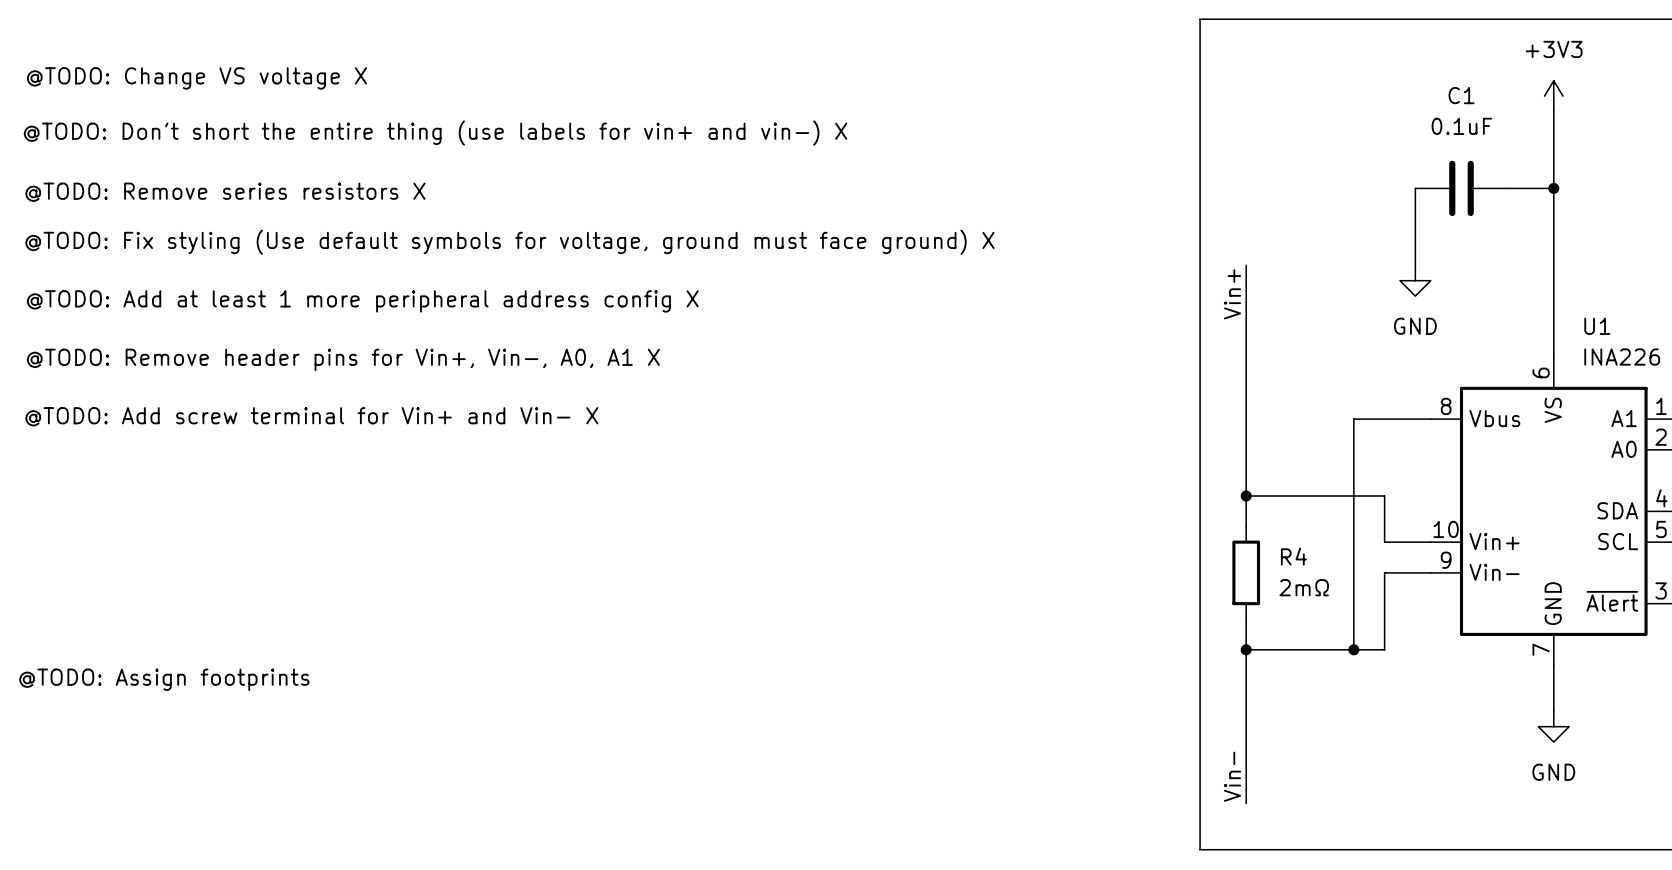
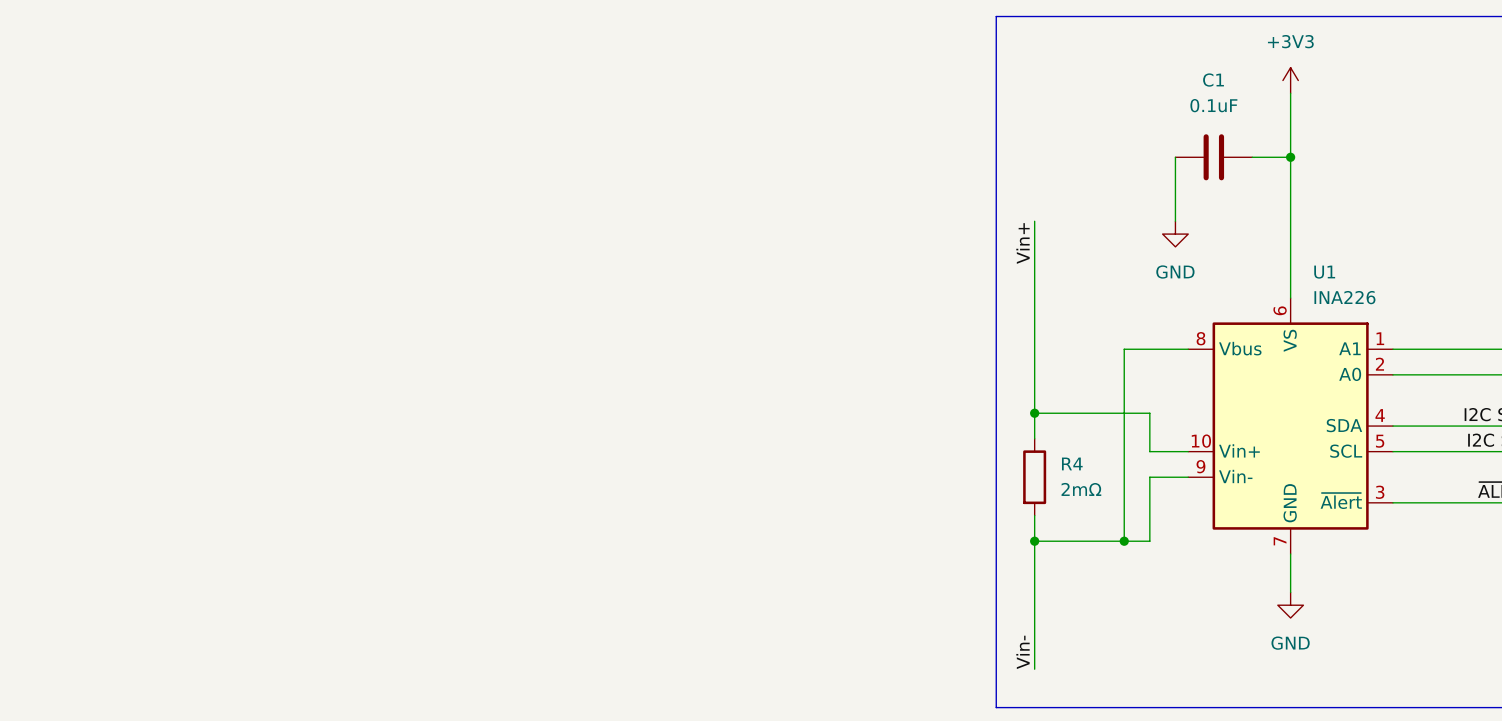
text: @TODO: Change VS voltage X (196, 78) -> none
text: @TODO: Don't short the entire thing (use labels for vin+ and vin-) X (435, 133) -> none
text: @TODO: Remove series resistors X (225, 192) -> none
text: @TODO: Fix styling (Use default symbols for voltage, ground must face ground) X (509, 242) -> none
text: @TODO: Add at least 1 more peripheral address config X (362, 301) -> none
text: @TODO: Remove header pins for Vin+, Vin-, A0, A1 X (343, 359) -> none
text: @TODO: Add screw terminal for Vin+ and Vin- X (311, 416) -> none
text: @TODO: Assign footprints (164, 679) -> none

